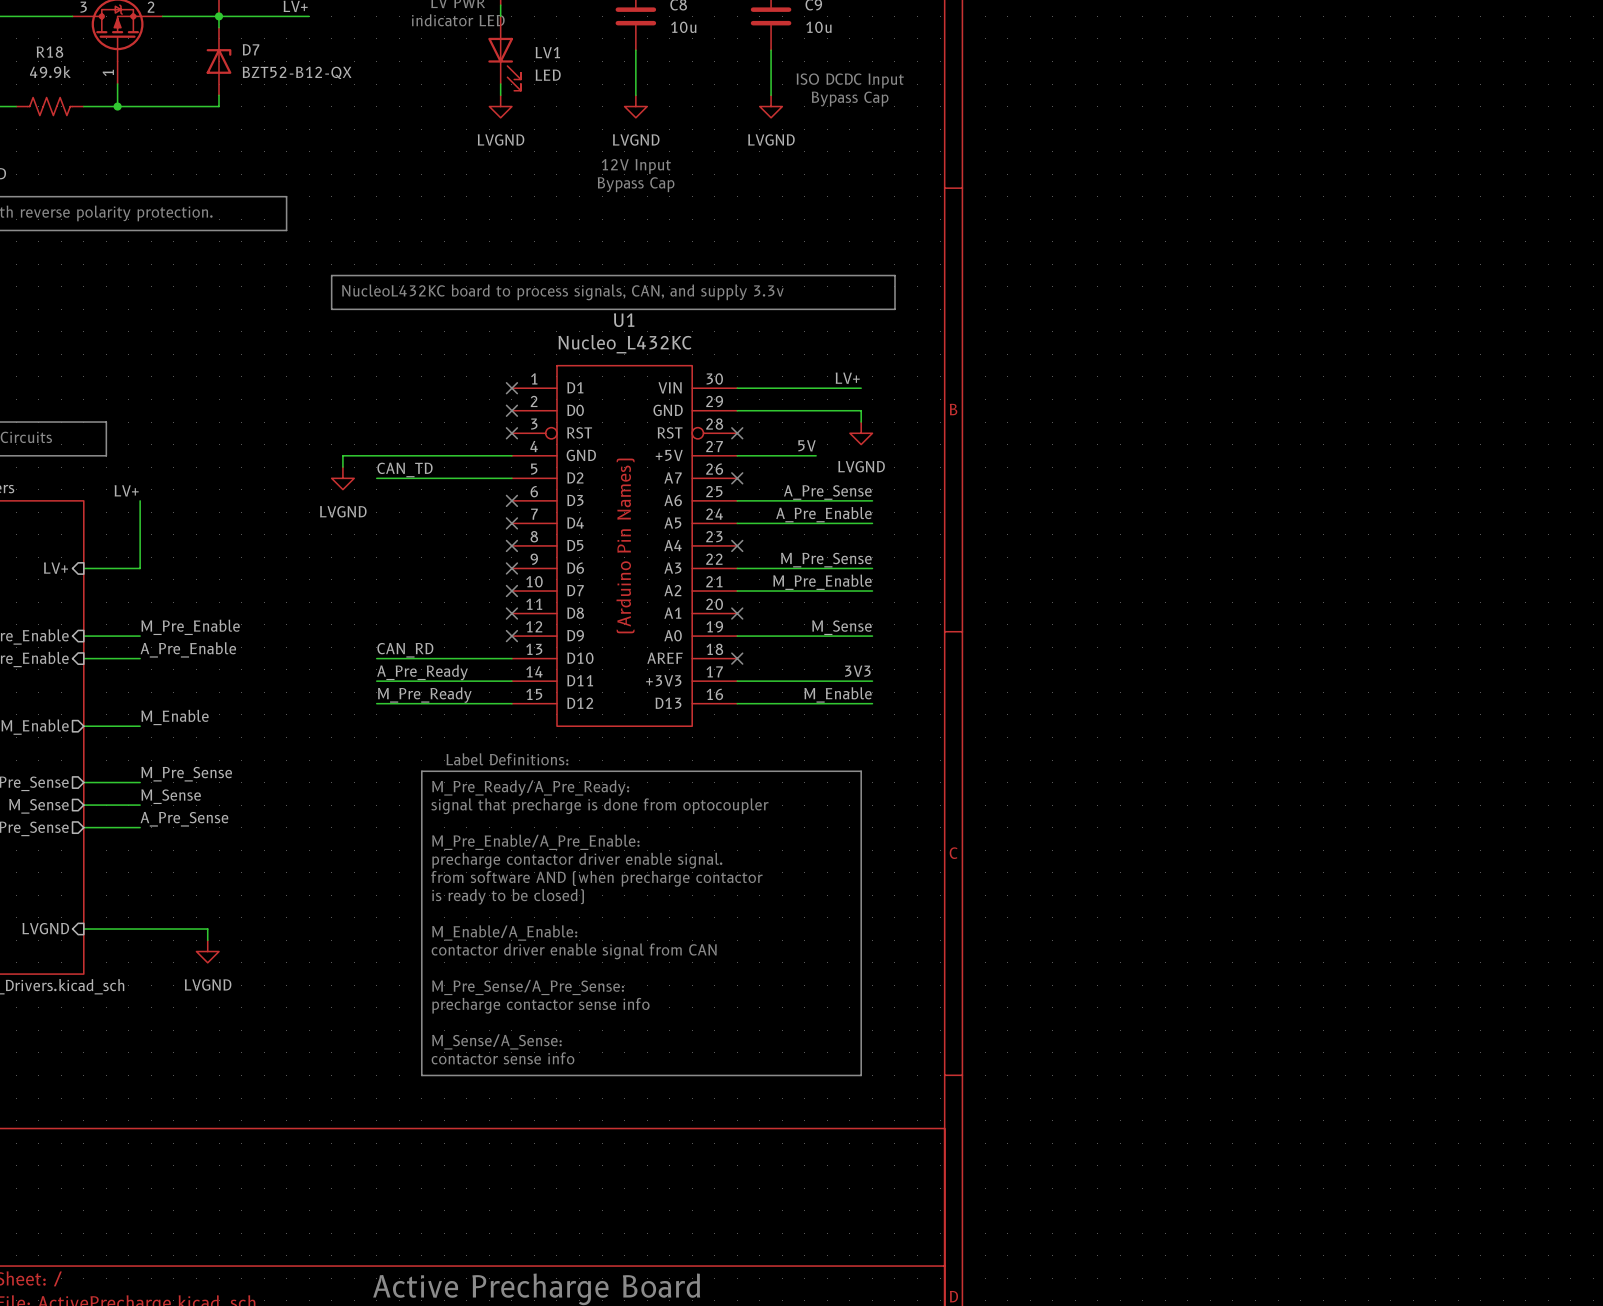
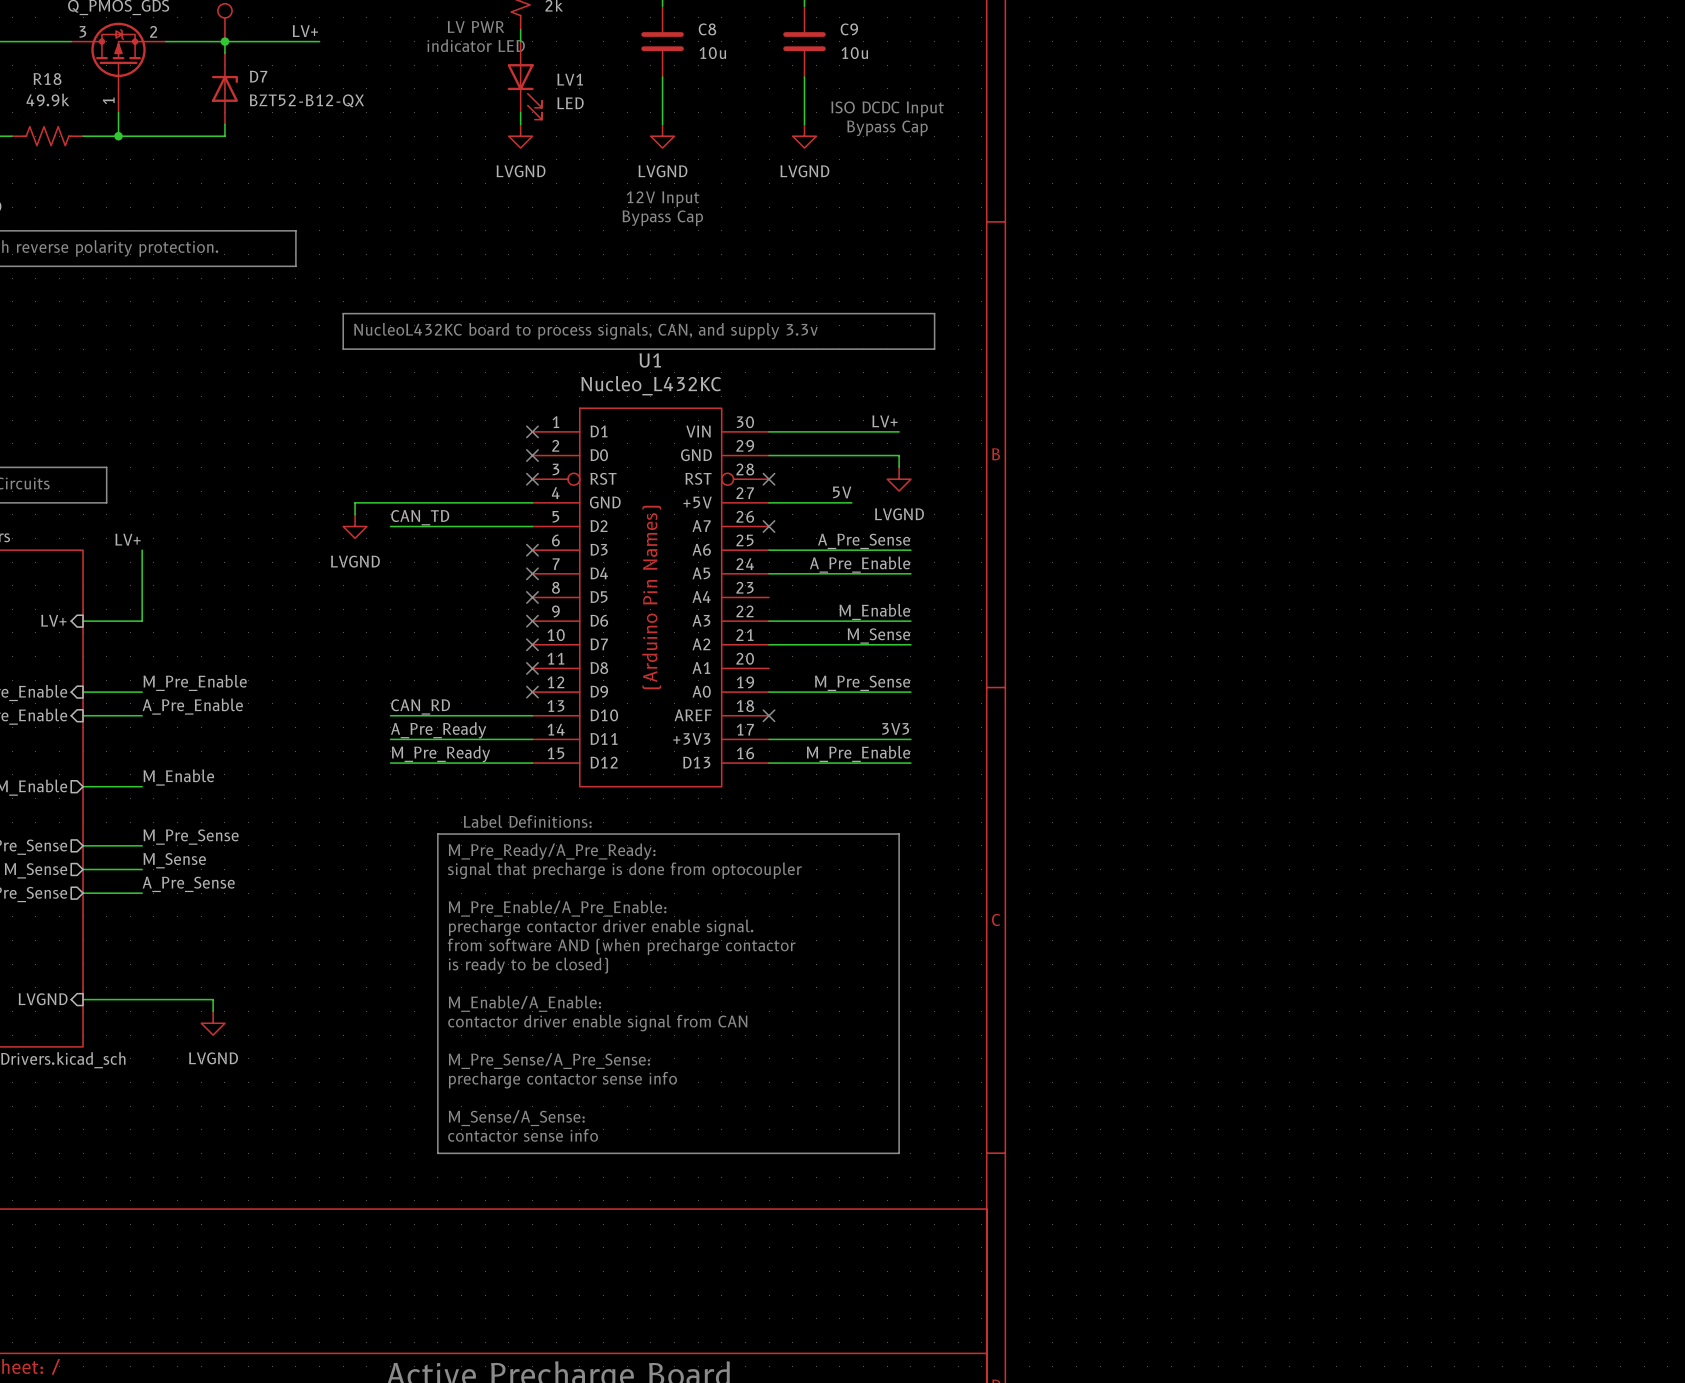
no-connect mark: (737, 545) -> none
label: M_Pre_Sense (826, 560) -> M_Enable (874, 611)
label: M_Pre_Enable (822, 582) -> M_Sense (878, 636)
no-connect mark: (737, 613) -> none
label: M_Sense (841, 627) -> M_Pre_Sense (862, 683)
label: M_Enable (838, 694) -> M_Pre_Enable (858, 753)

